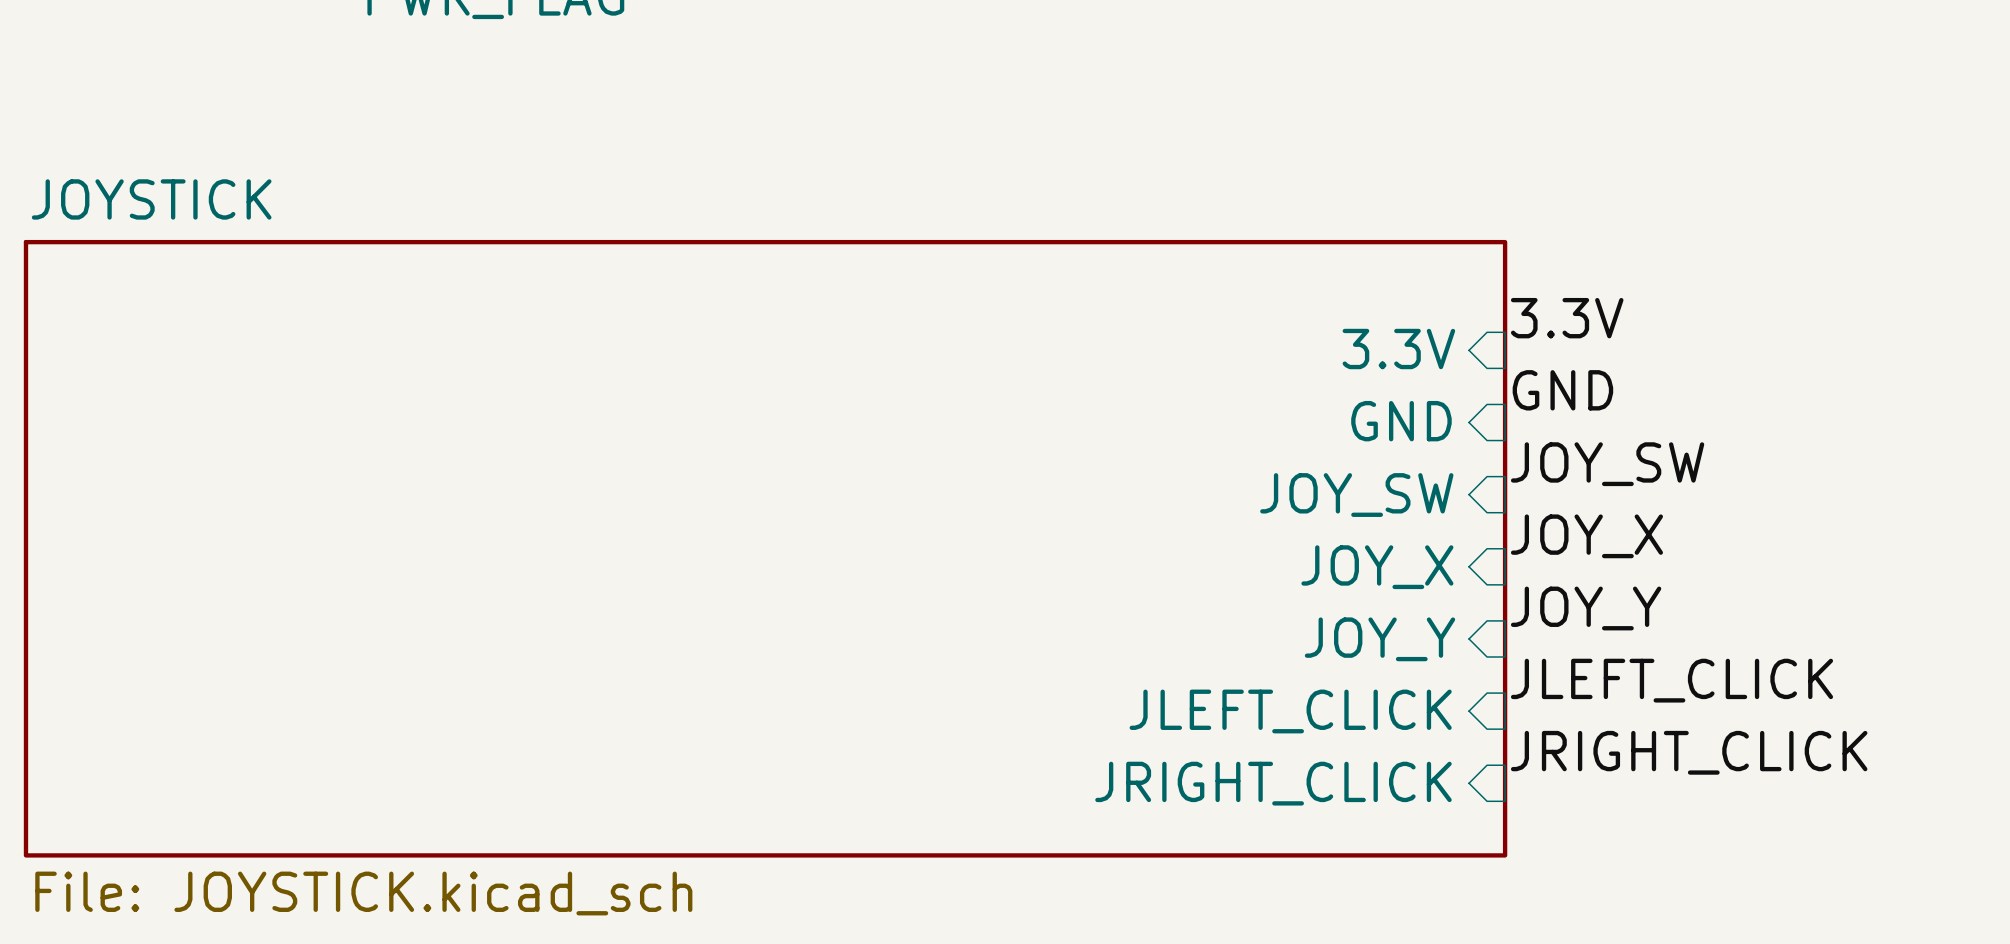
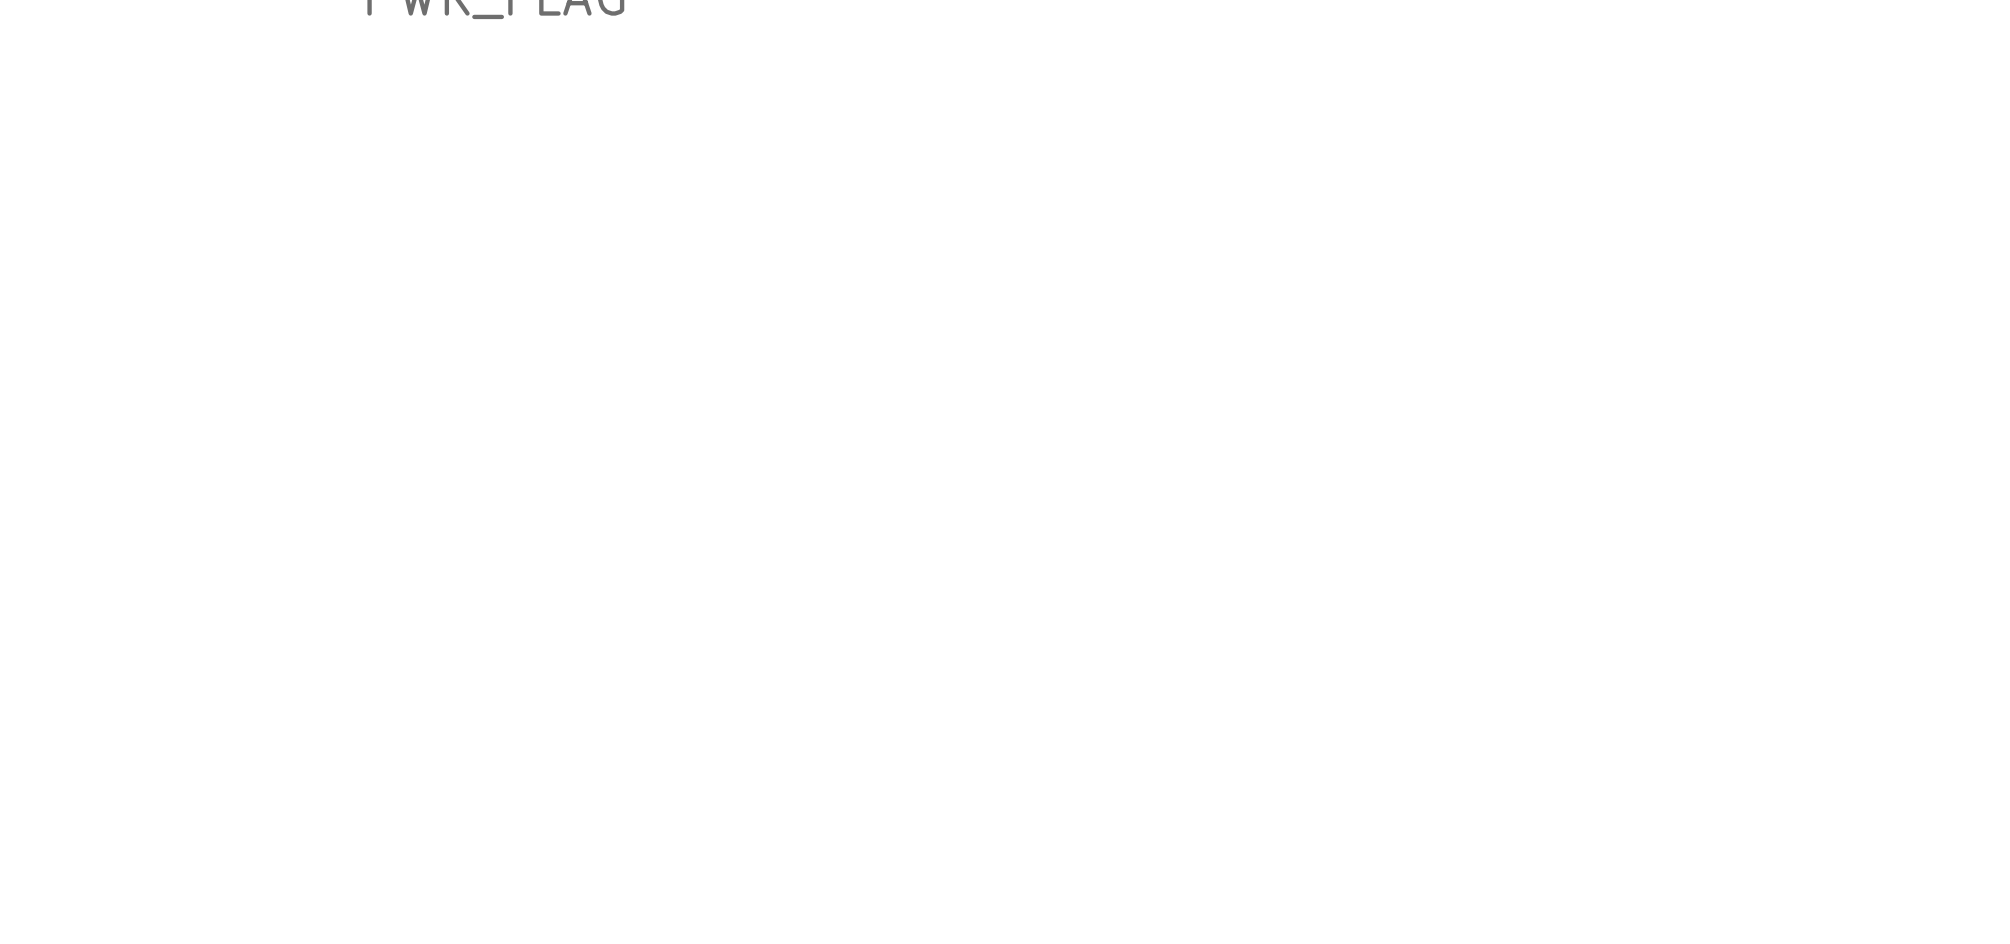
label: 3.3V (1567, 318) -> none
sheet pin: 3.3V (1398, 349) -> none
label: GND (1562, 390) -> none
sheet pin: GND (1401, 421) -> none
label: JOY_SW (1607, 464) -> none
sheet pin: JOY_SW (1356, 495) -> none
label: JOY_X (1586, 536) -> none
sheet JOYSTICK: File: JOYSTICK.kicad_sch (765, 548) -> none
sheet pin: JOY_X (1377, 567) -> none
label: JOY_Y (1586, 608) -> none
sheet pin: JOY_Y (1379, 639) -> none
label: JLEFT_CLICK (1672, 680) -> none
sheet pin: JLEFT_CLICK (1290, 711) -> none
label: JRIGHT_CLICK (1689, 752) -> none
sheet pin: JRIGHT_CLICK (1273, 783) -> none

